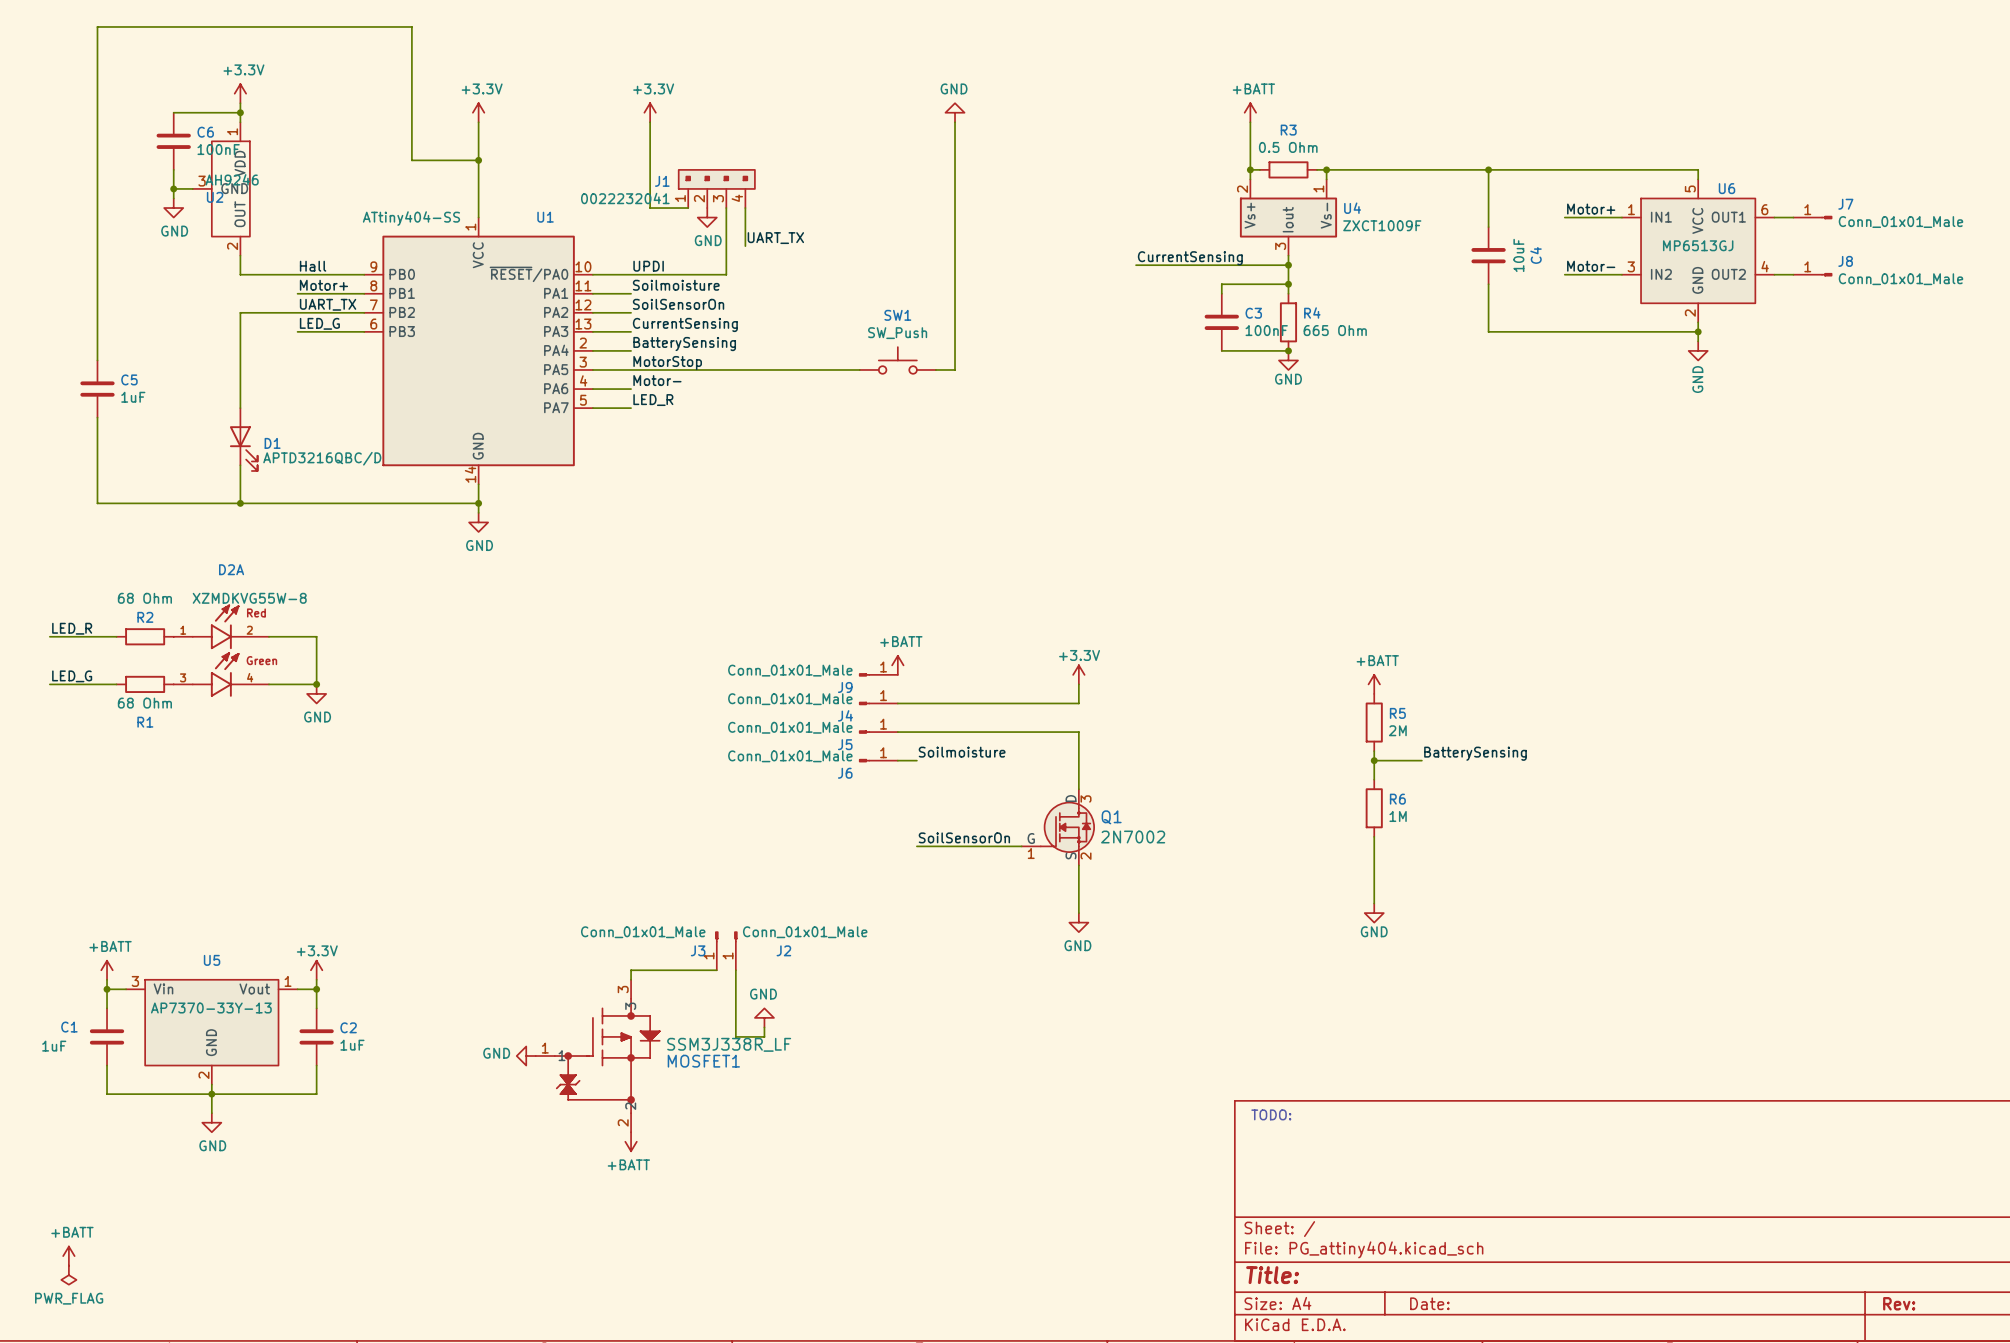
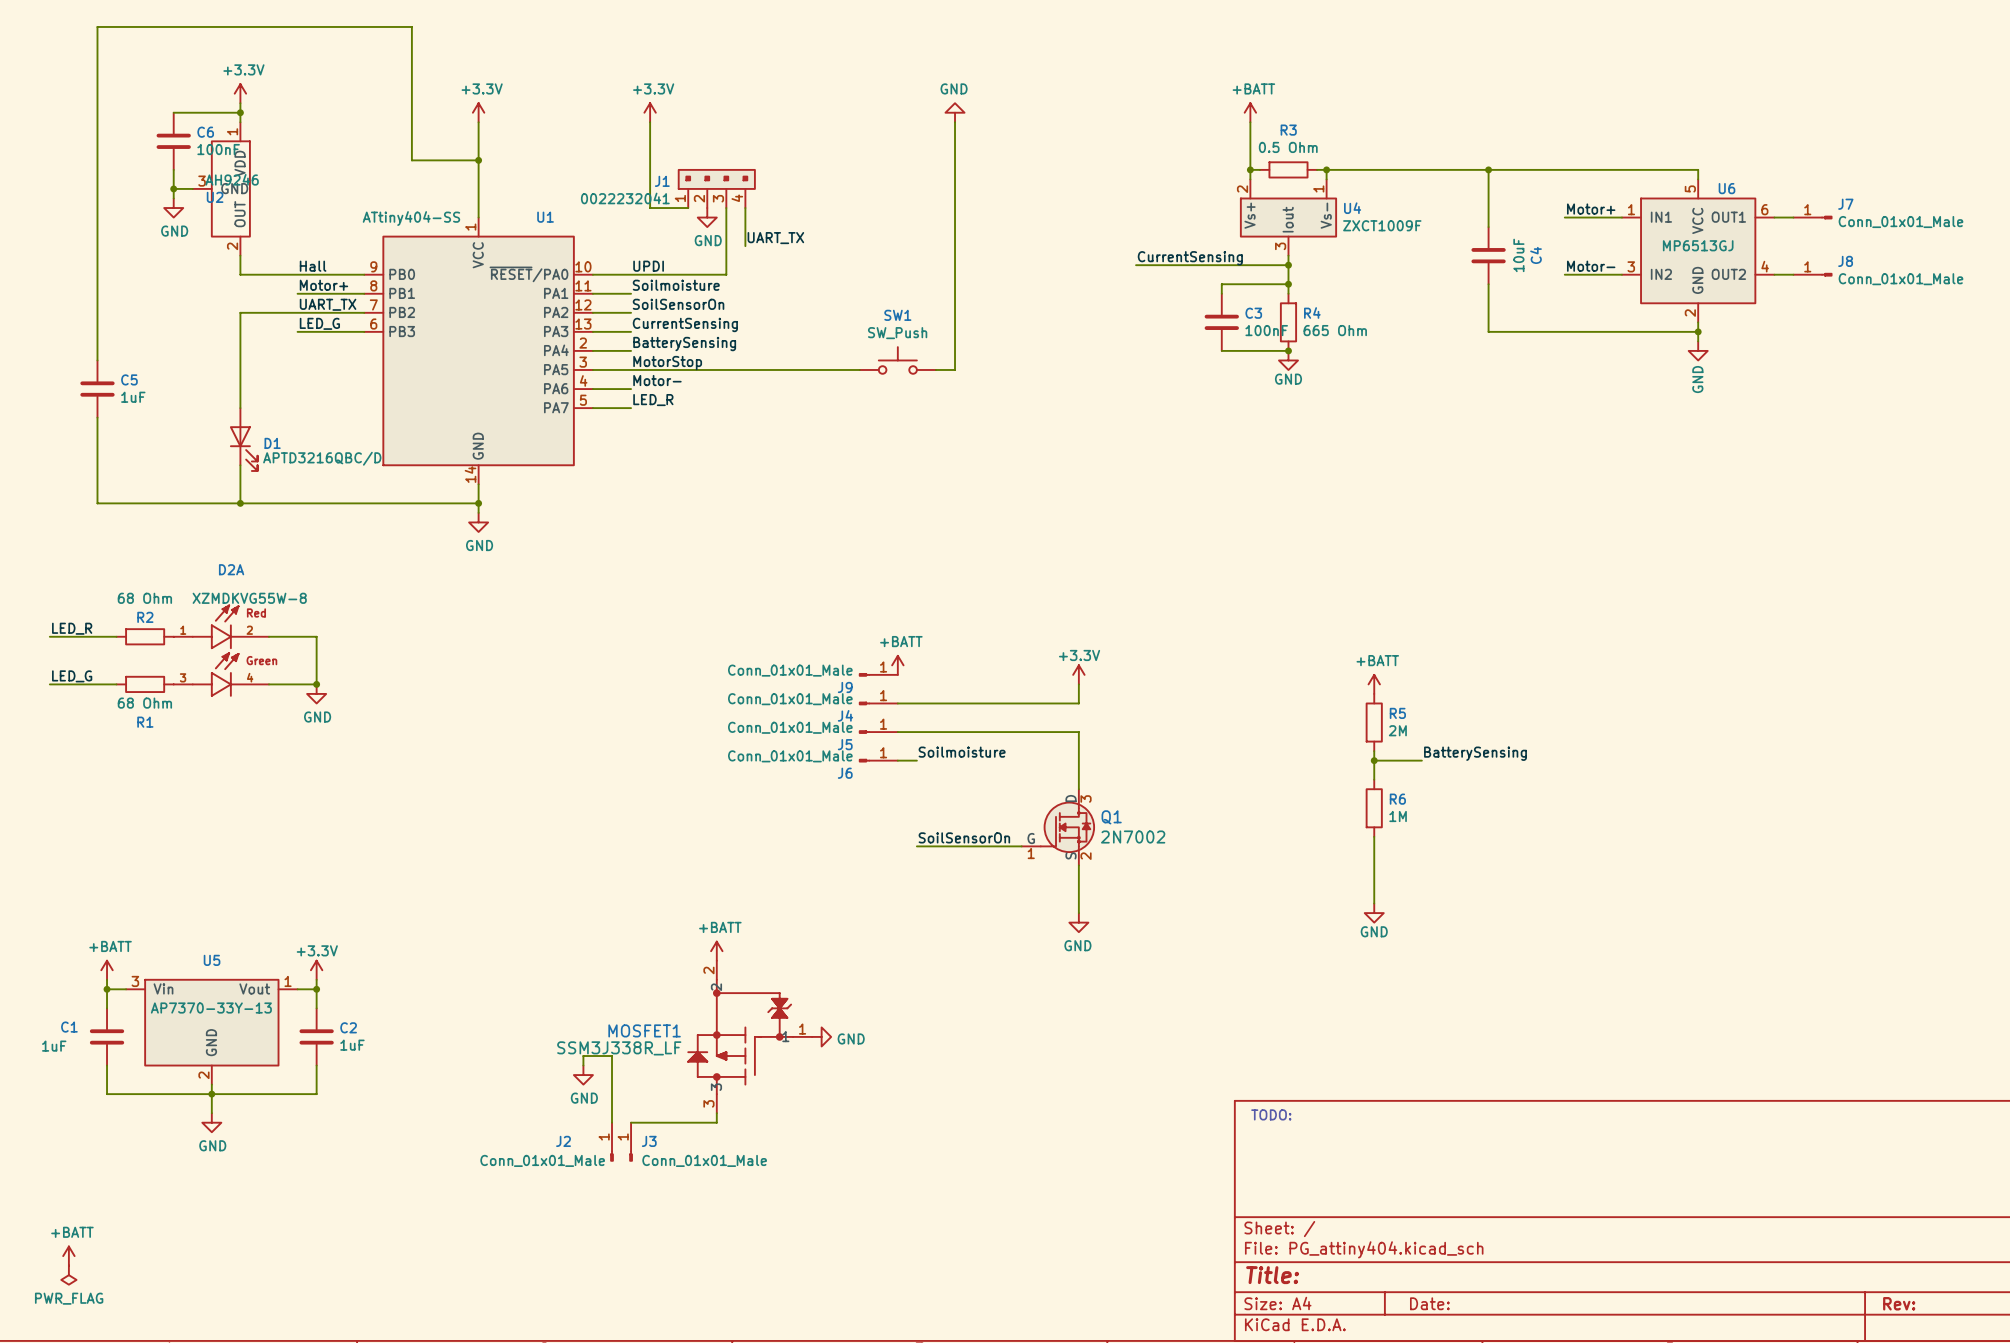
J3 rotation: 0° (716, 936) -> 180° (631, 1156)
J2 rotation: 0° (735, 936) -> 180° (612, 1156)
J3 position: (716, 950) -> (631, 1142)
J2 position: (735, 950) -> (612, 1142)
power symbol: none -> +BATT (716, 951)
wire: (716, 970) (631, 970) (631, 979) -> none
wire: (735, 970) (735, 1036) (764, 1036) (764, 1027) -> none
power symbol rotation: 0° (764, 1017) -> 90° clockwise (821, 1036)
power symbol position: GND (764, 1017) -> GND (821, 1036)
power symbol rotation: 0° (526, 1056) -> 90° counterclockwise (583, 1075)
power symbol position: GND (526, 1056) -> GND (583, 1075)
MOSFET1 position: (597, 1056) -> (749, 1036)
MOSFET1 rotation: 0° (607, 1056) -> 180° (740, 1036)
wire: none -> (583, 1065) (583, 1056) (612, 1056) (612, 1122)
wire: none -> (716, 1113) (716, 1122) (631, 1122)
power symbol: +BATT (631, 1141) -> none

